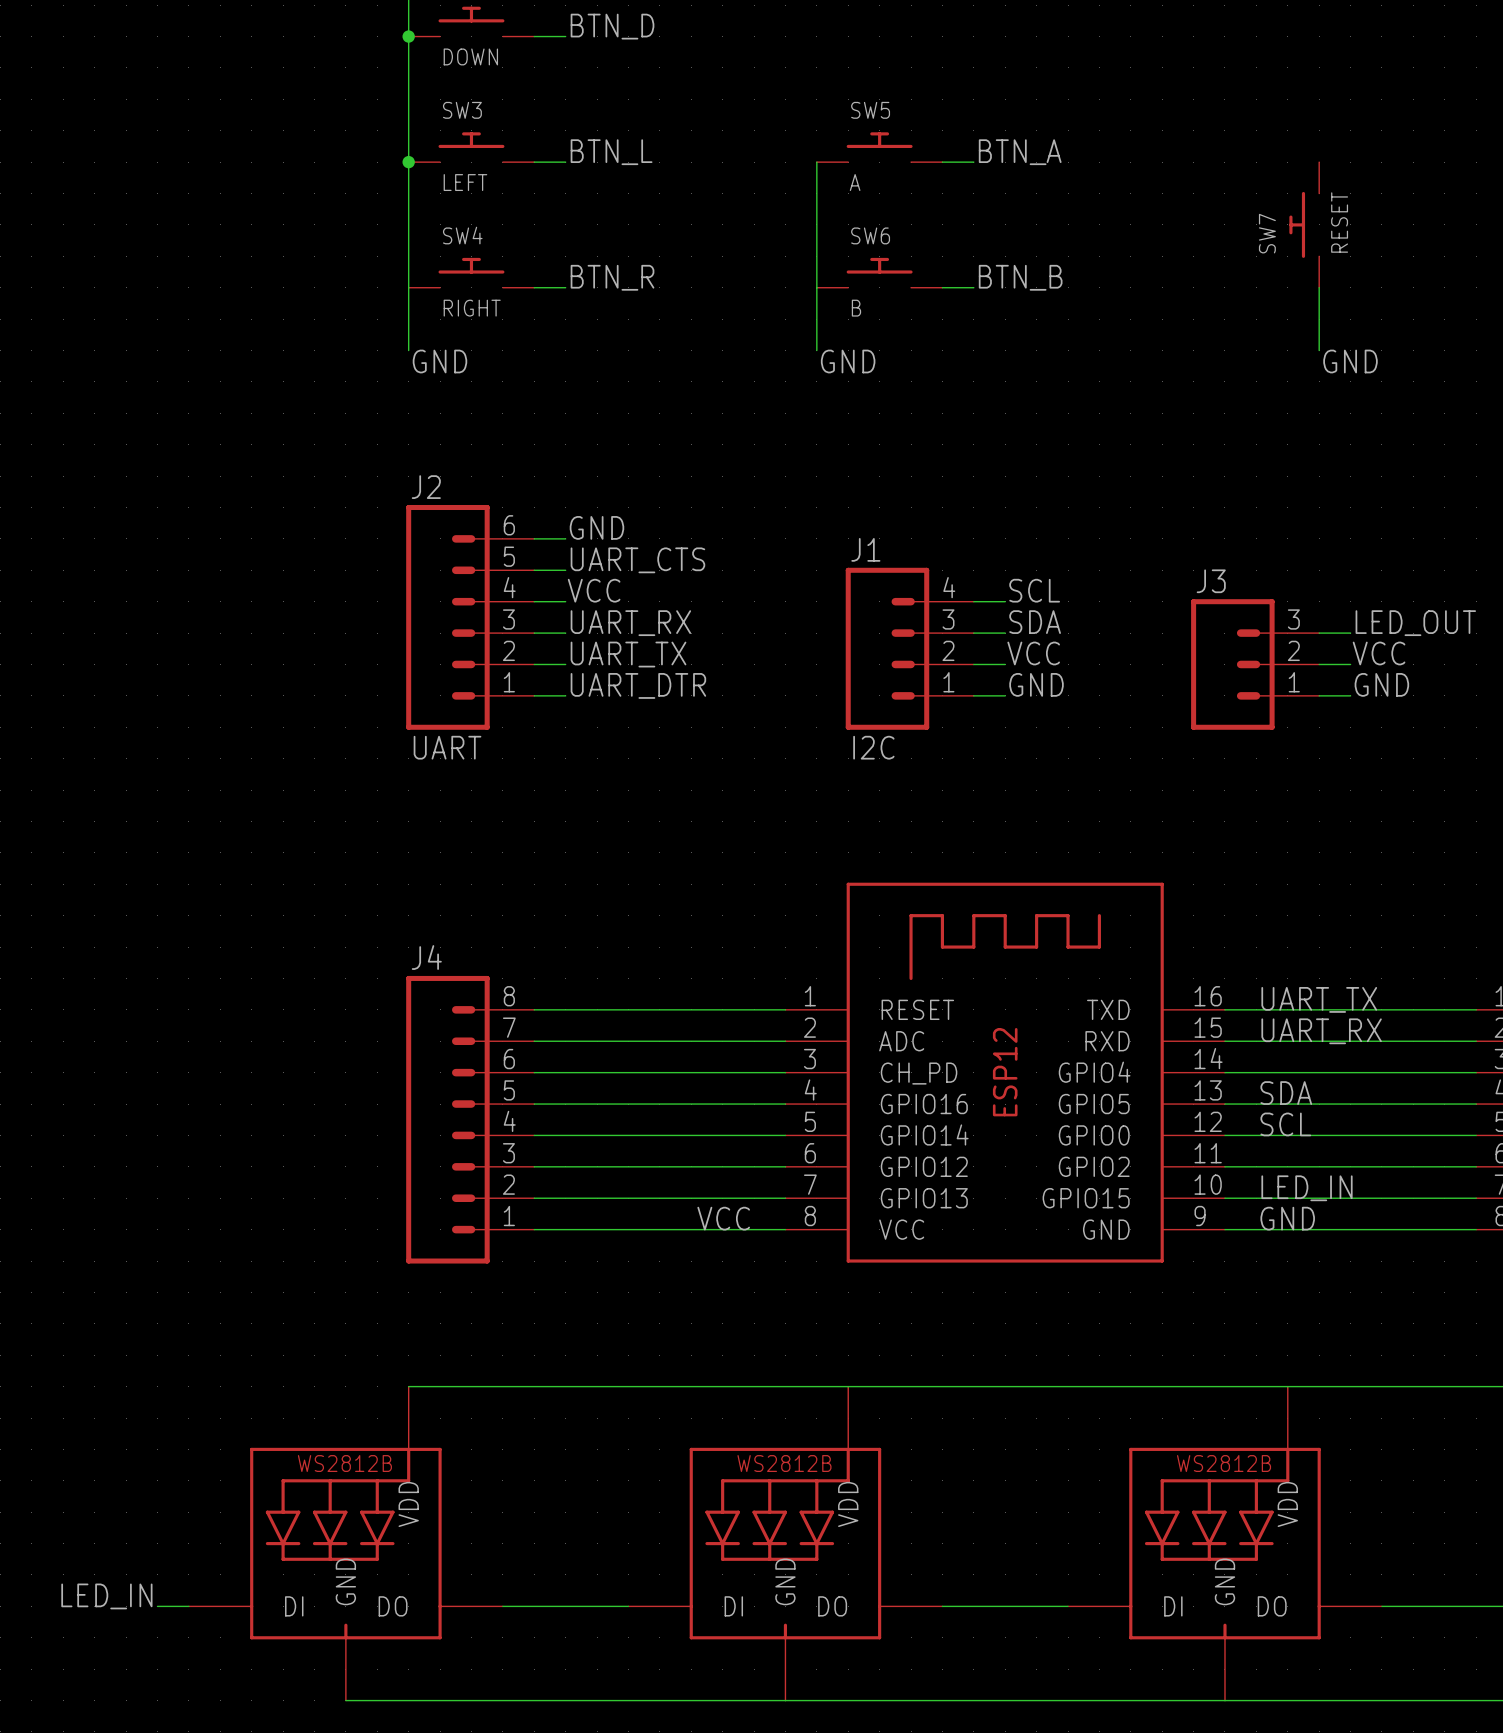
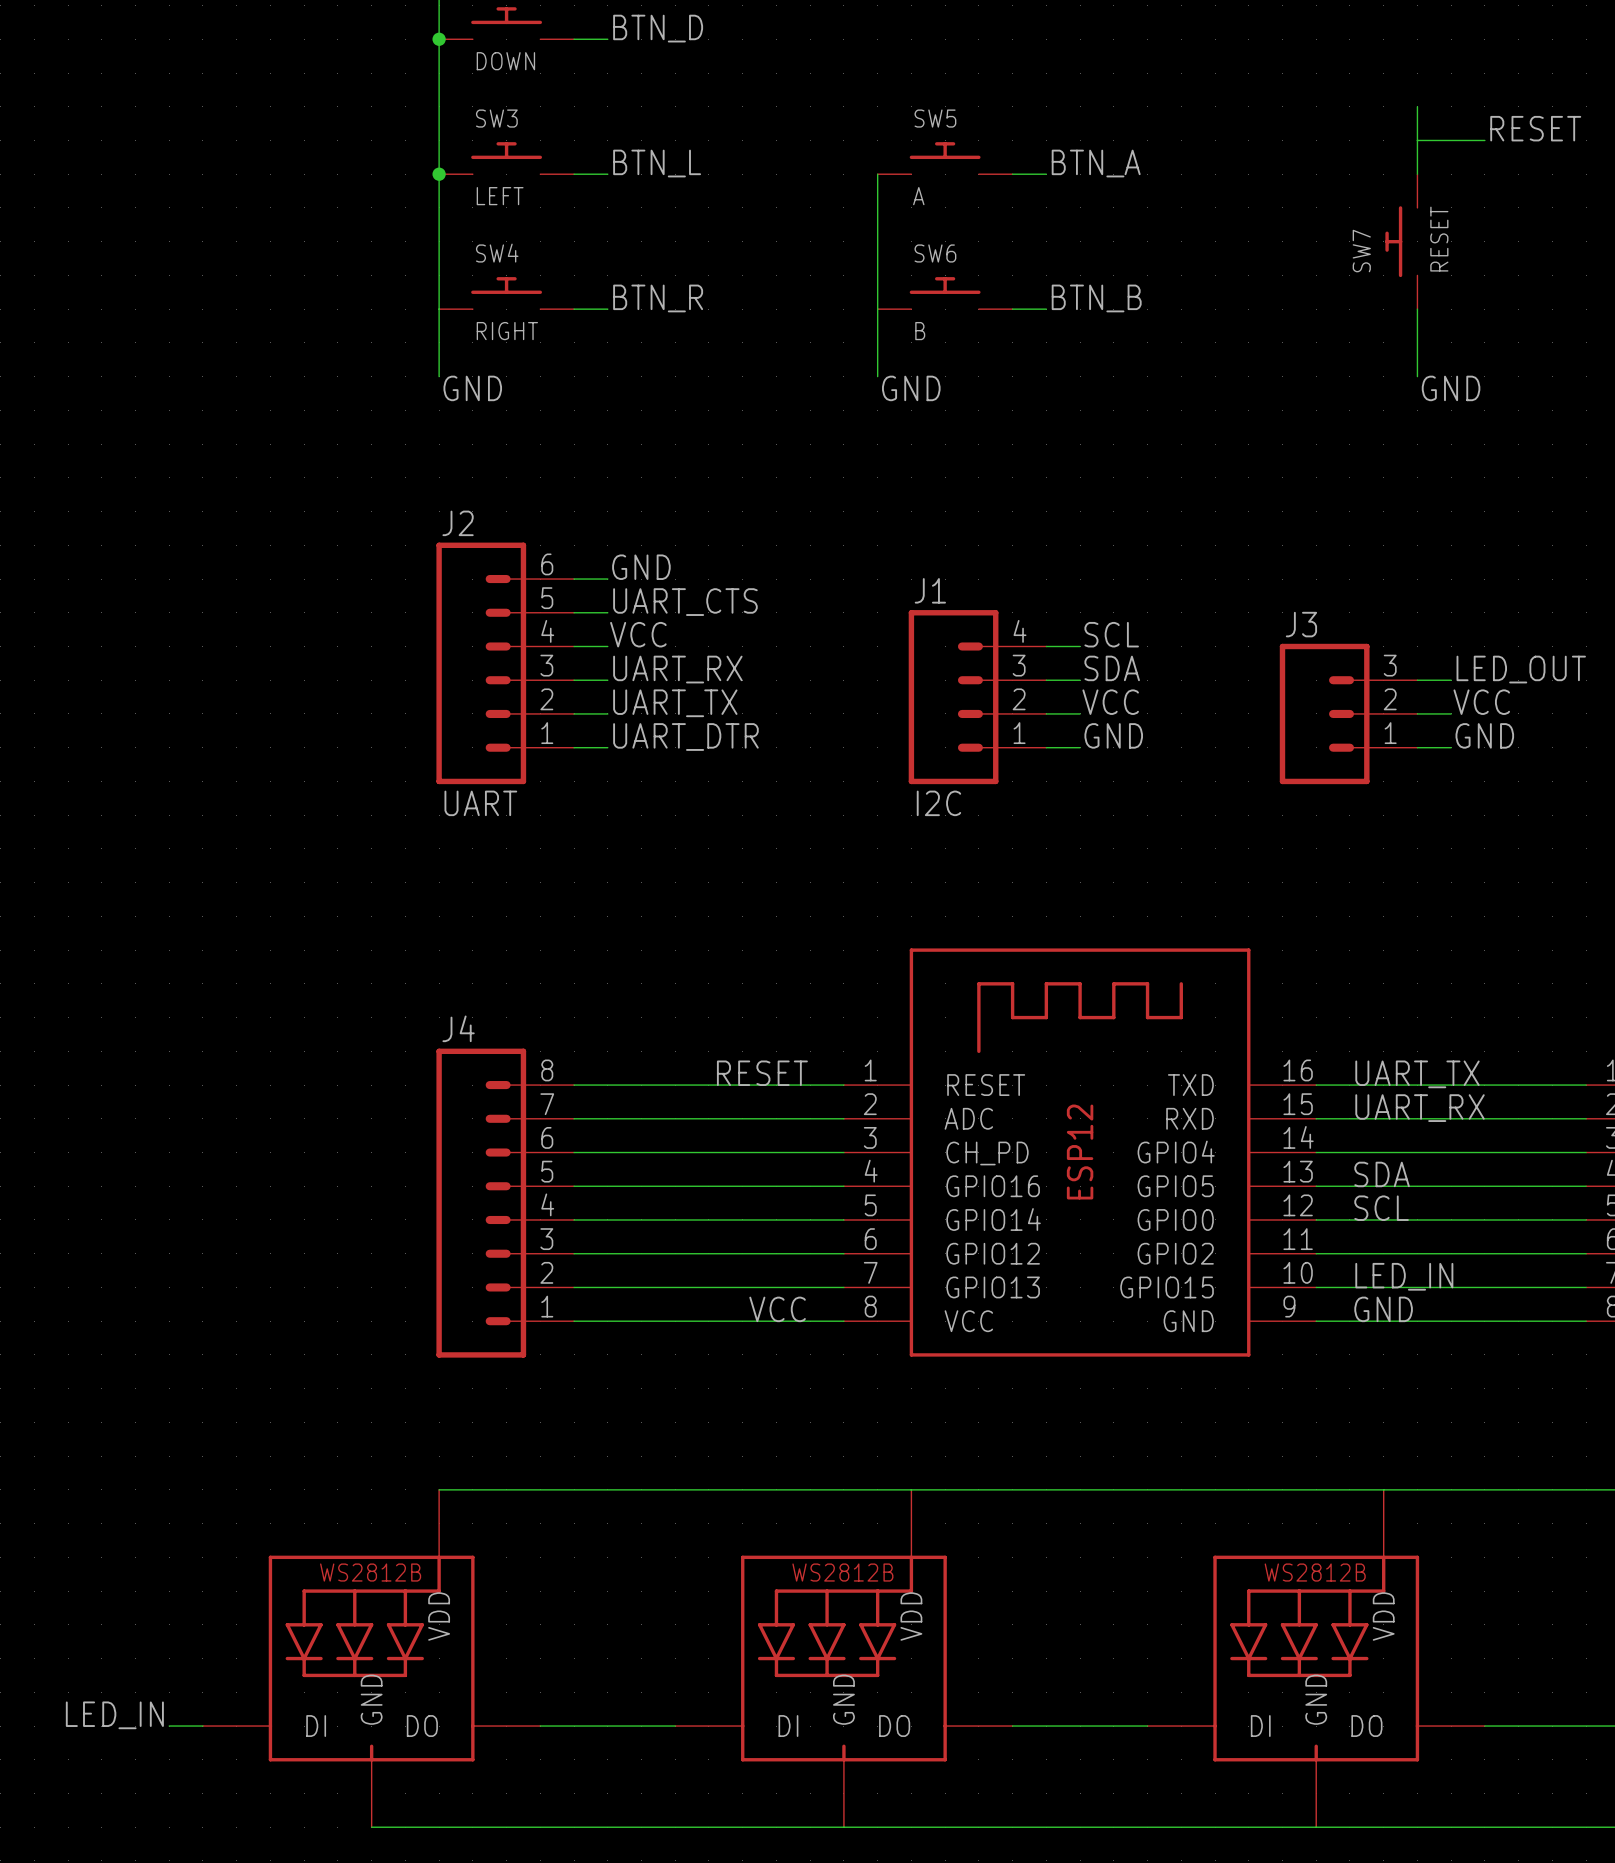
wire: none -> (1417, 106) (1417, 174)
label: none -> RESET (1535, 128)
wire: none -> (1417, 140) (1484, 140)
label: none -> RESET (762, 1073)

